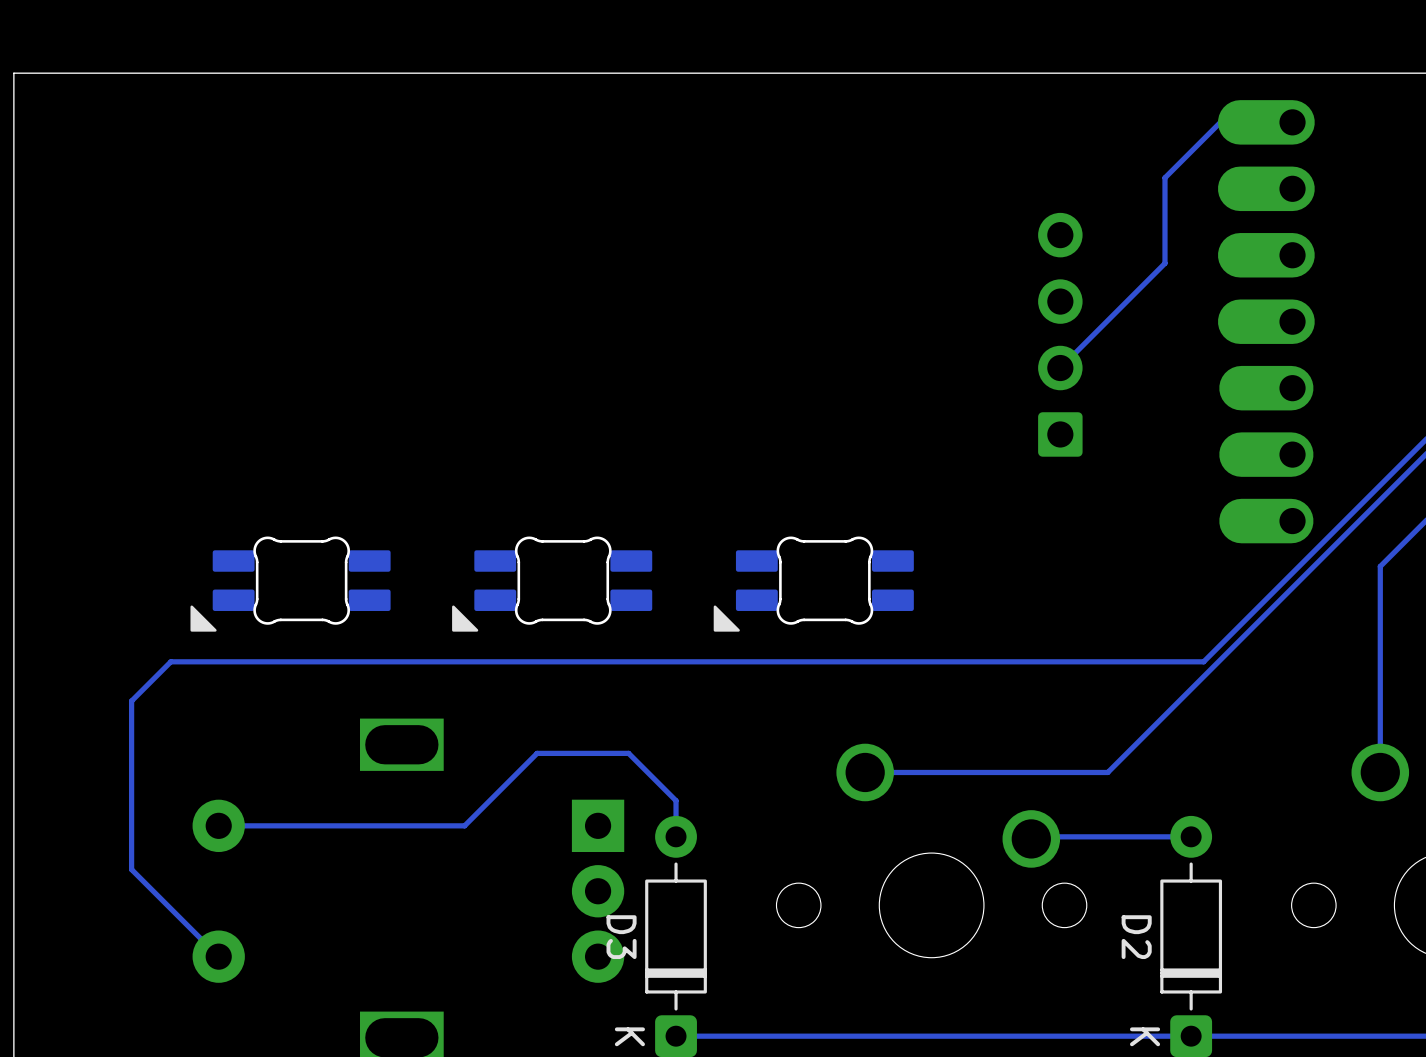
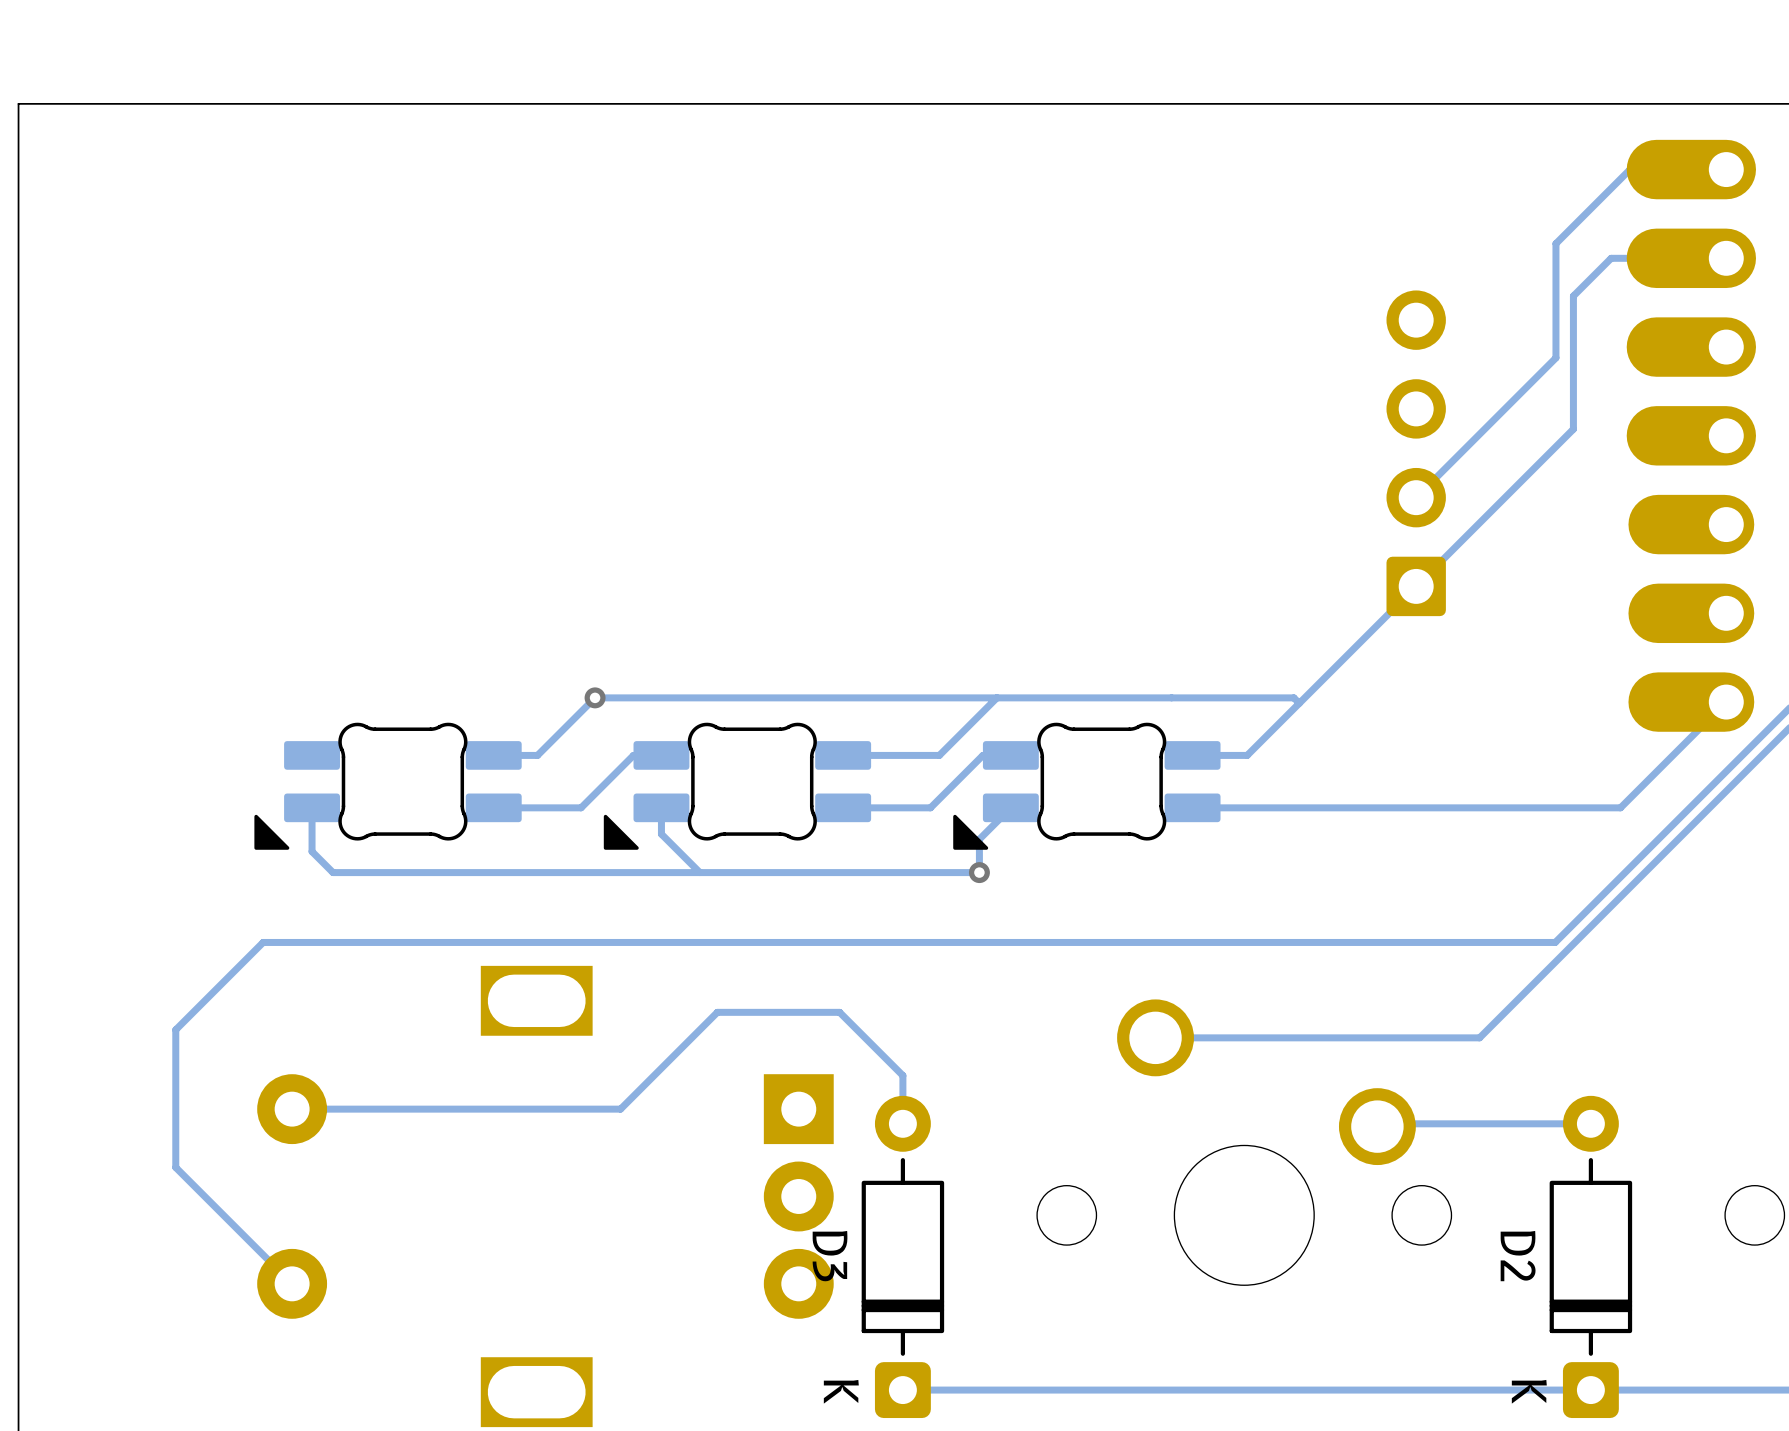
track: none -> (1726, 258) (1611, 258) (1573, 296) (1573, 429) (1247, 755) (1192, 755)
via: none -> (595, 697)
track: none -> (996, 697) (939, 755) (843, 755)
track: none -> (1299, 703) (1293, 697) (595, 697) (537, 755) (493, 755)
track: none -> (1726, 702) (1620, 807) (1192, 807)
track: none -> (661, 755) (633, 755) (581, 807) (493, 807)
track: none -> (1010, 755) (982, 755) (930, 807) (843, 807)
track: none -> (661, 807) (661, 834) (699, 872)
track: none -> (1010, 807) (979, 839) (979, 872) (333, 872) (312, 851) (312, 807)
via: none -> (979, 872)
track: (1203, 661) (170, 661) (131, 701) (131, 766) -> (1607, 890) (1555, 942) (263, 942) (175, 1029)

